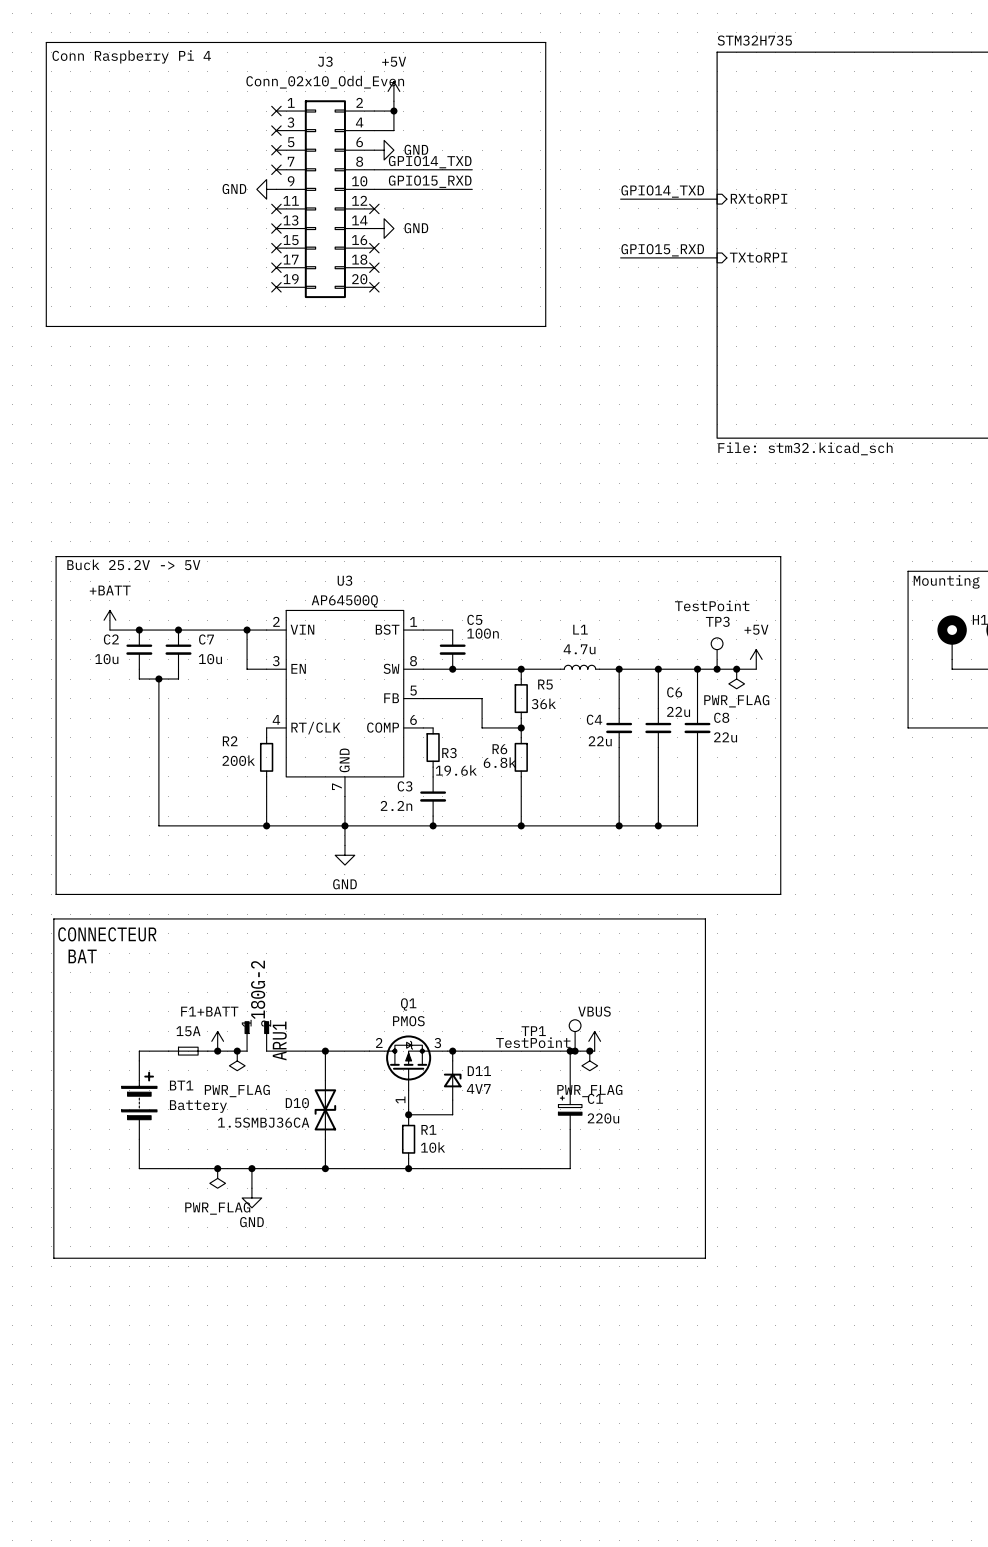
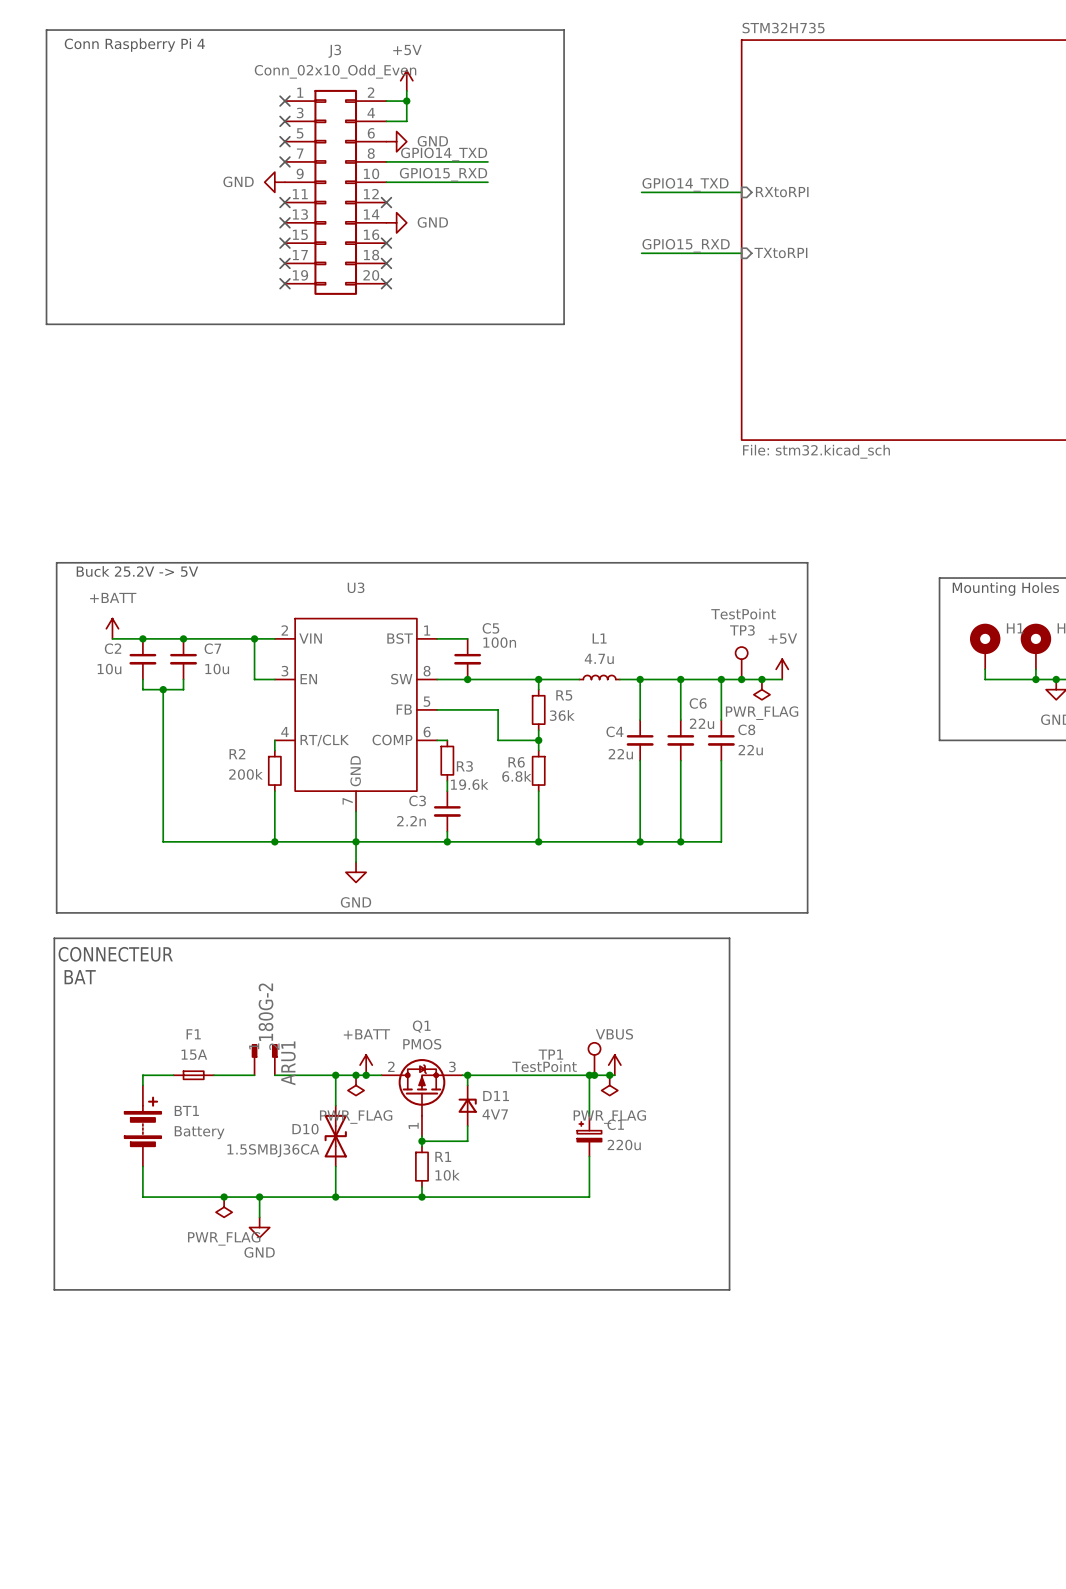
U3 value: AP64500Q (344, 601) -> none
power symbol position: +BATT (217, 1041) -> +BATT (366, 1065)
junction: (217, 1051) -> none
junction: (237, 1051) -> none
junction: none -> (356, 1075)
junction: none -> (366, 1075)
power symbol position: PWR_FLAG (237, 1060) -> PWR_FLAG (356, 1085)

